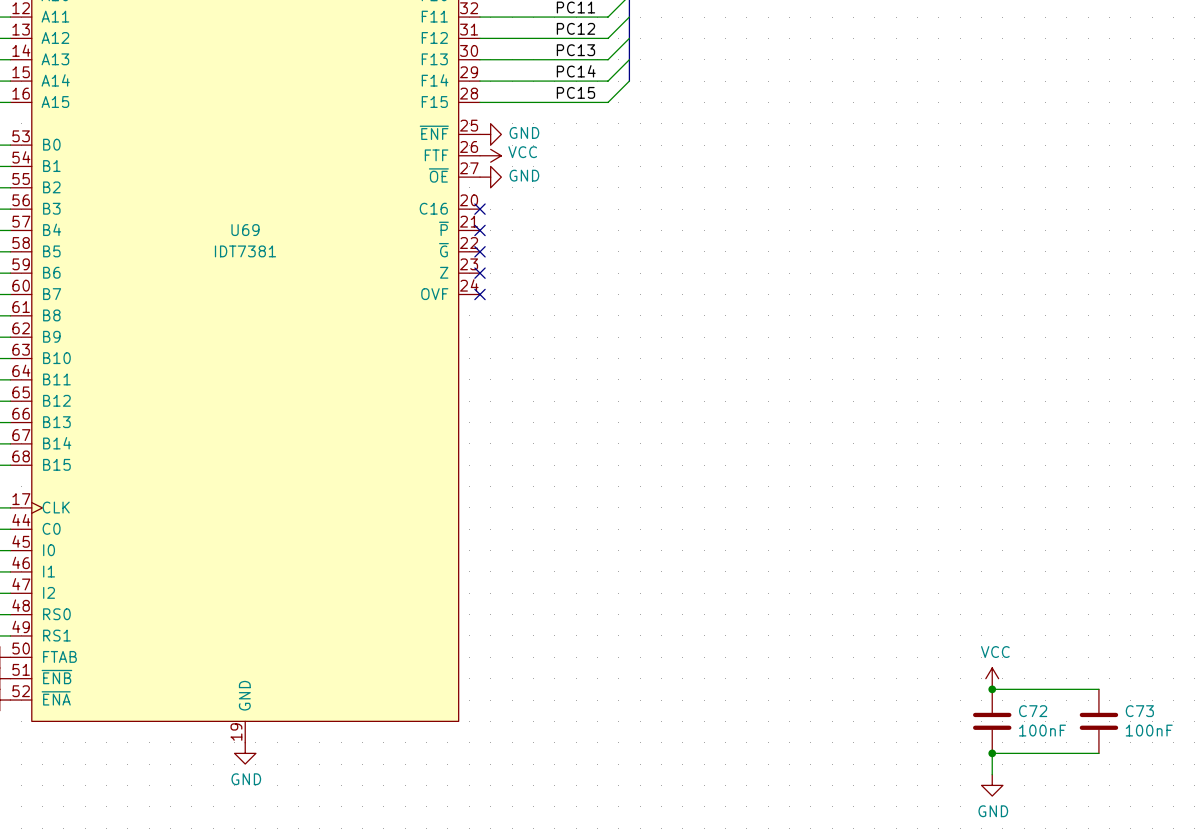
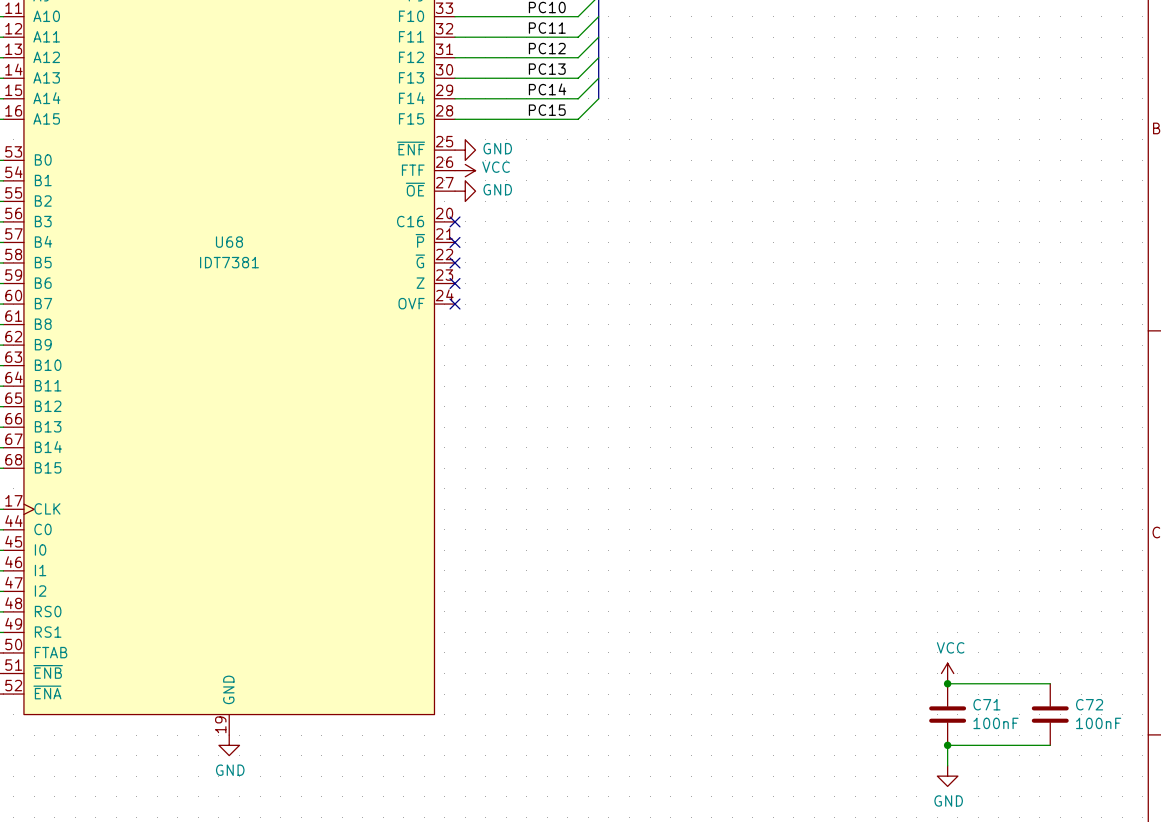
U69 name: U69 (245, 230) -> U68 (229, 242)
C72 name: C72 (1033, 711) -> C71 (986, 704)
C73 name: C73 (1139, 711) -> C72 (1089, 704)

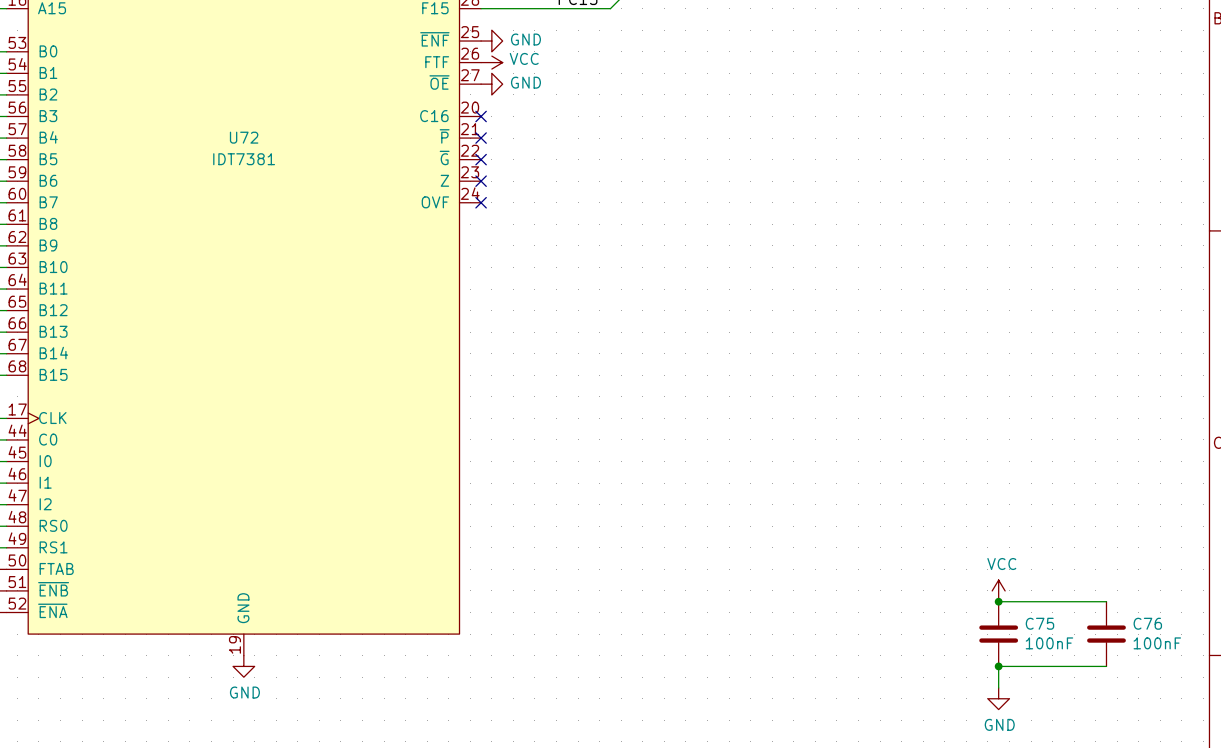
U68 name: U68 (229, 242) -> U72 (244, 137)
C71 name: C71 (986, 704) -> C75 (1039, 623)
C72 name: C72 (1089, 704) -> C76 (1147, 623)

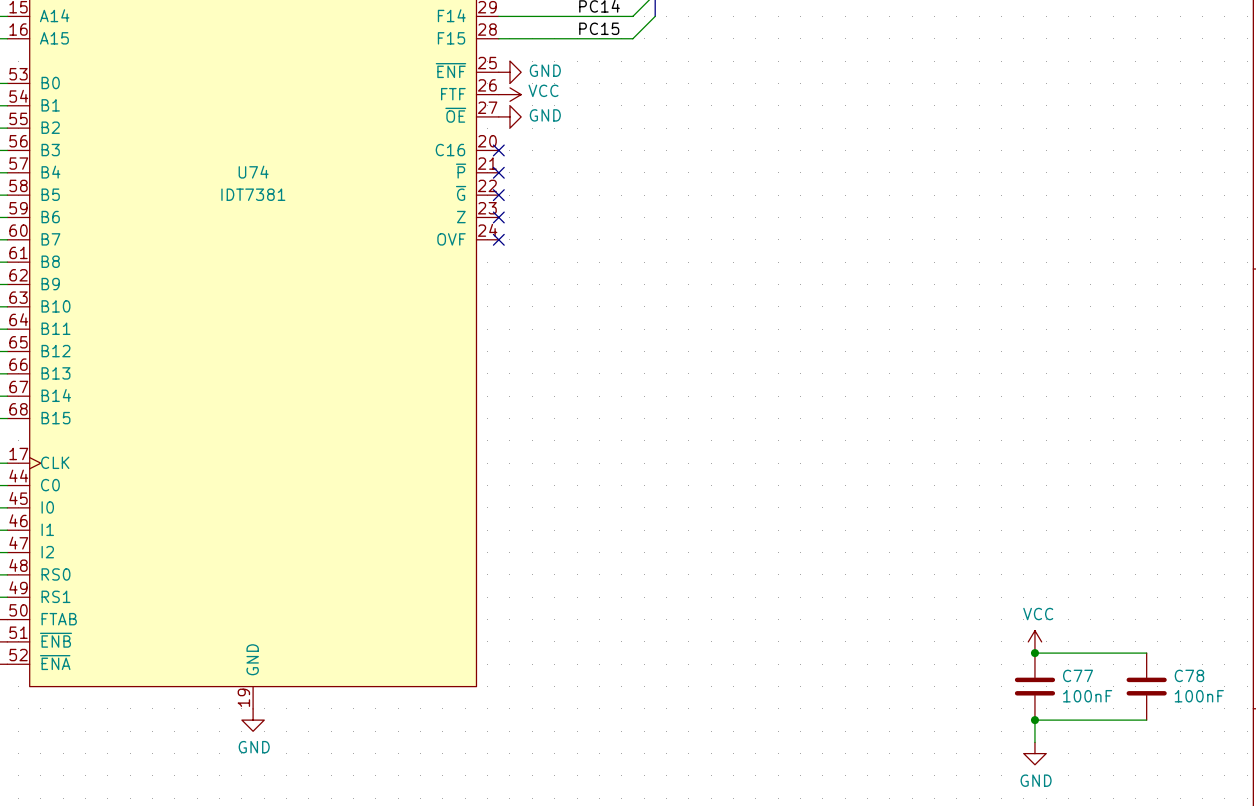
U72 name: U72 (244, 137) -> U74 (253, 172)
C75 name: C75 (1039, 623) -> C77 (1078, 675)
C76 name: C76 (1147, 623) -> C78 (1189, 675)

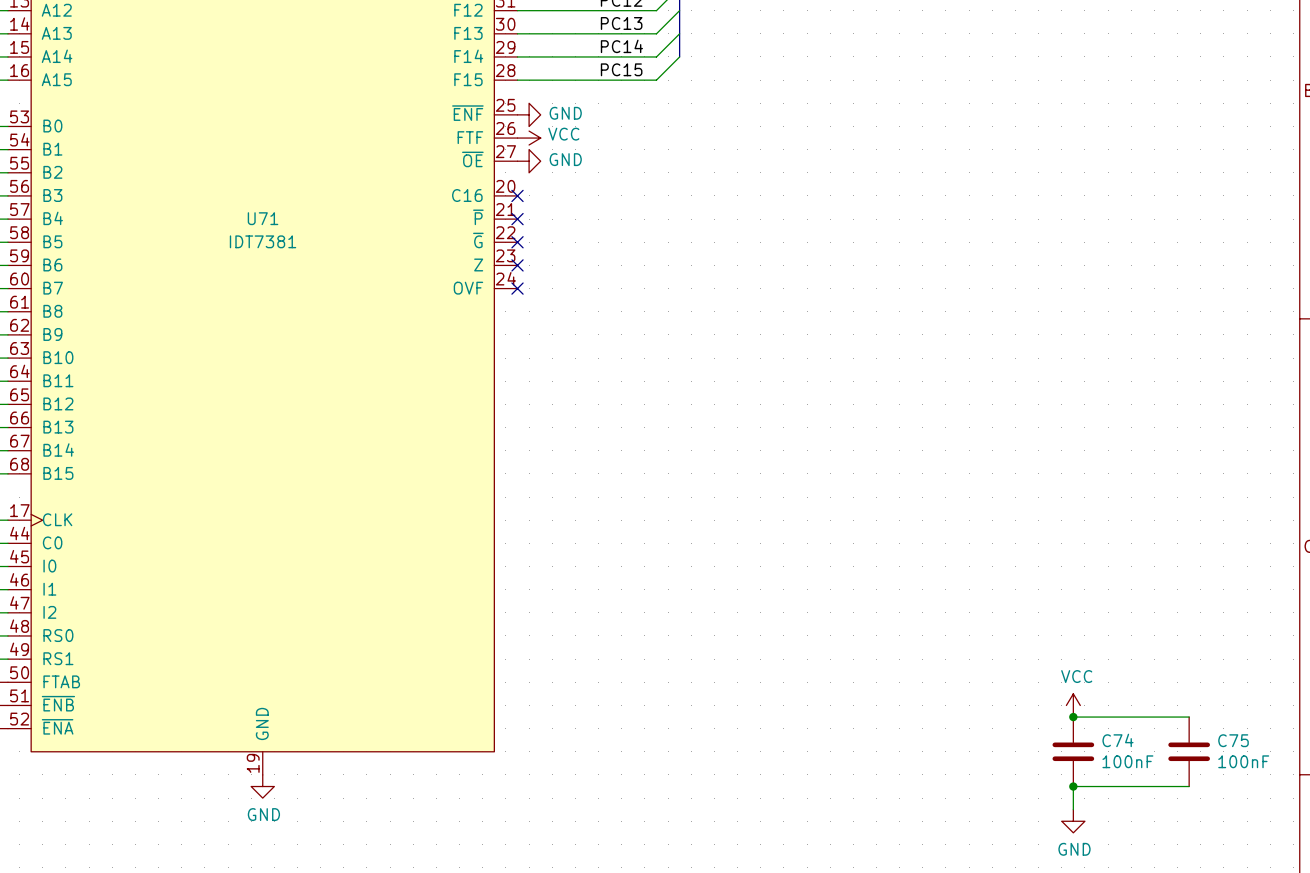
U74 name: U74 (253, 172) -> U71 (263, 218)
C77 name: C77 (1078, 675) -> C74 (1117, 740)
C78 name: C78 (1189, 675) -> C75 (1233, 740)

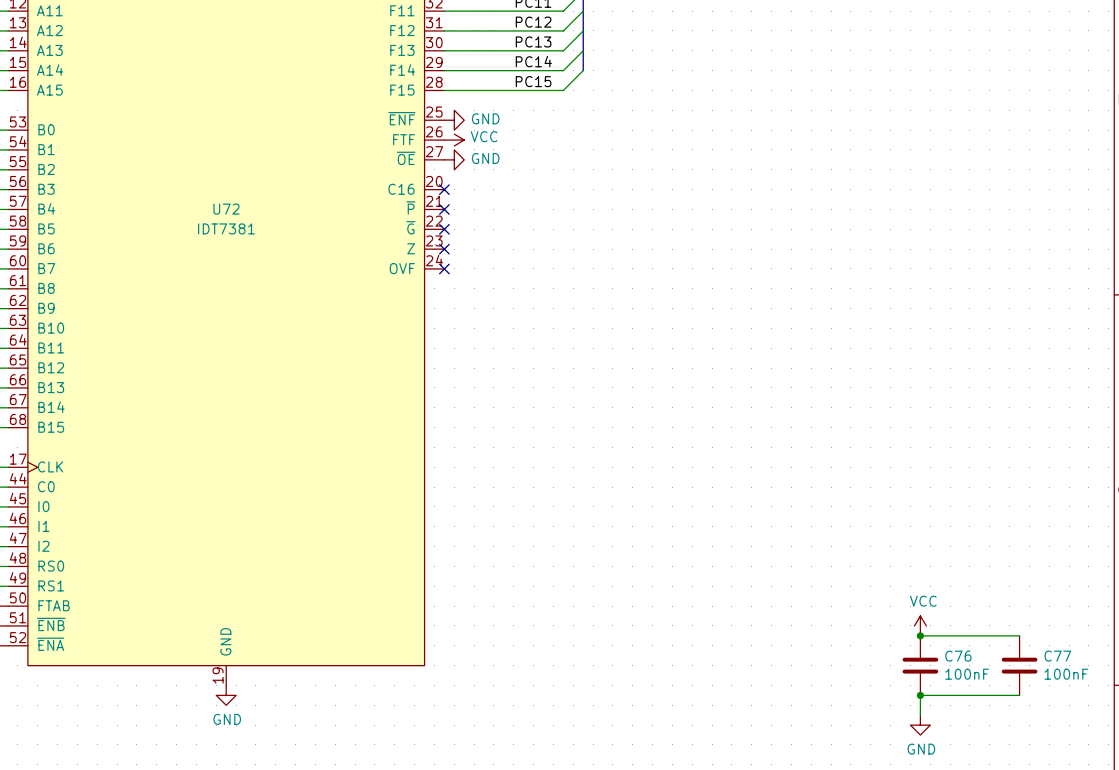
U71 name: U71 (263, 218) -> U72 (226, 209)
C74 name: C74 (1117, 740) -> C76 (958, 656)
C75 name: C75 (1233, 740) -> C77 (1057, 656)

